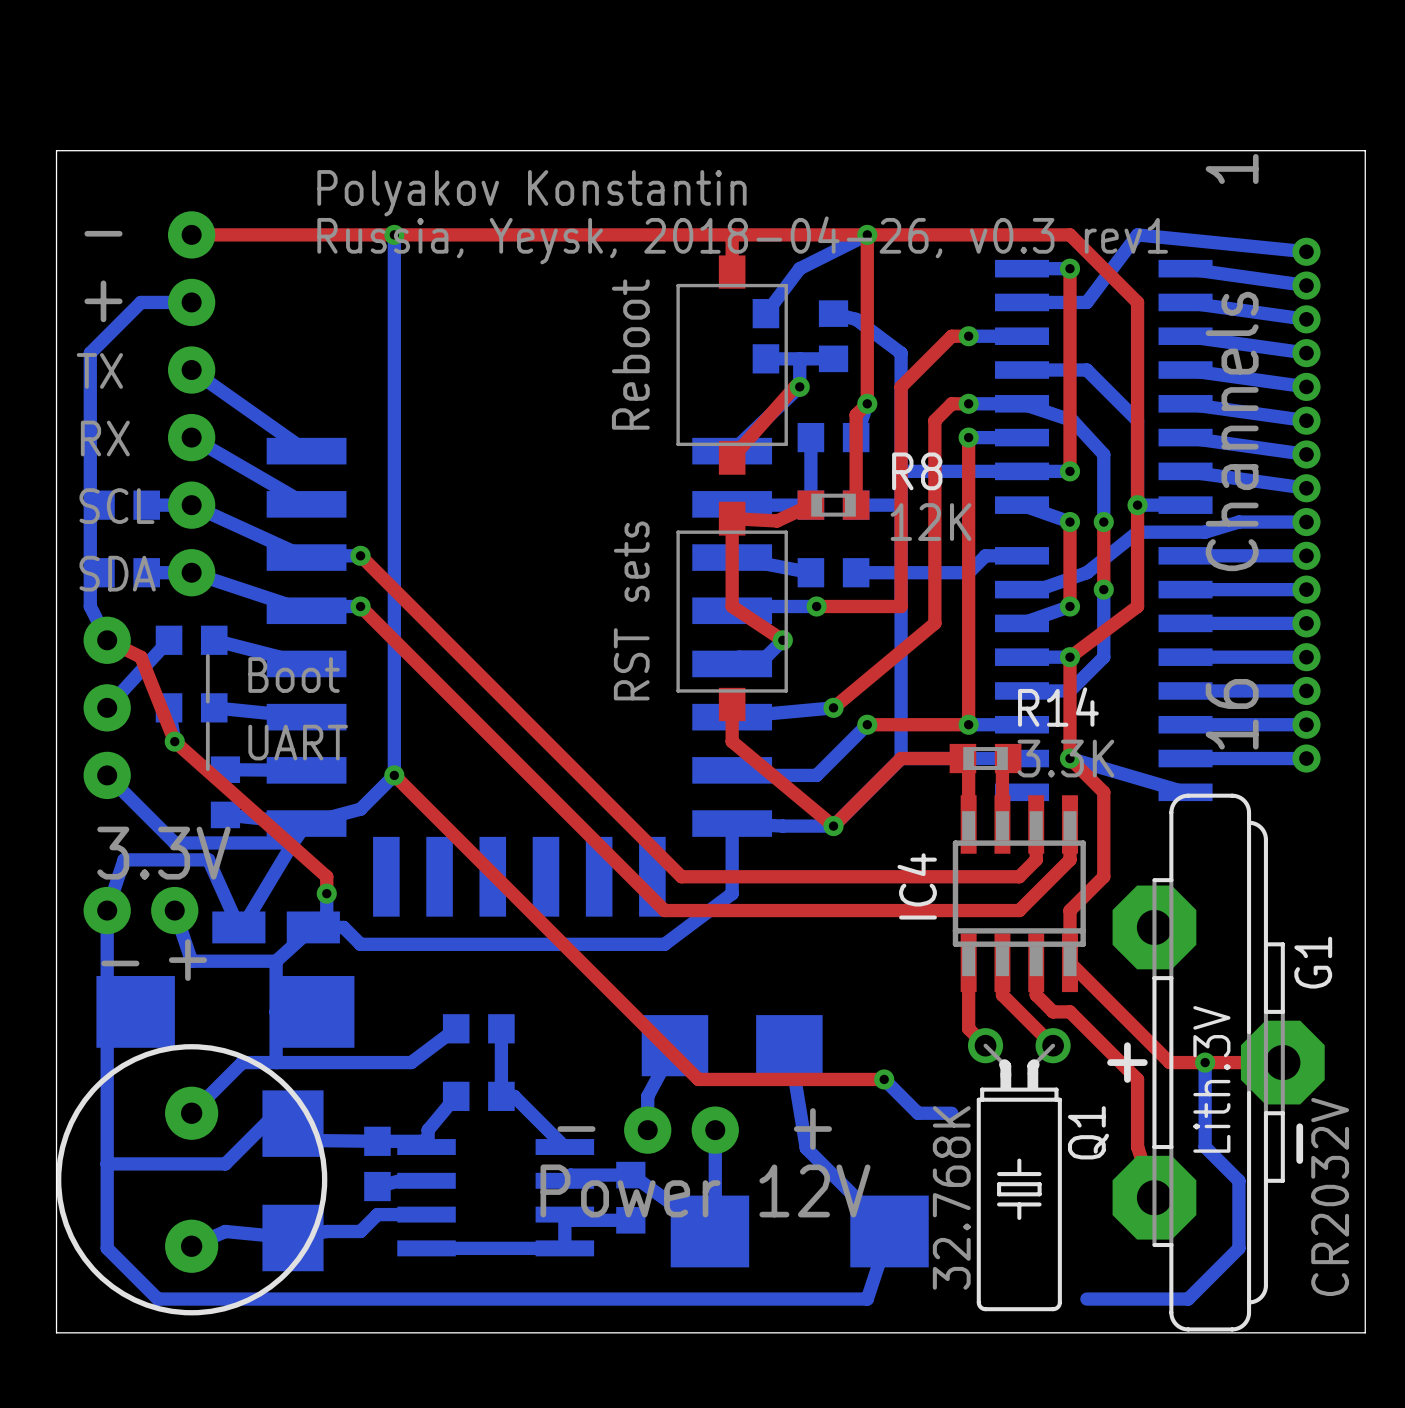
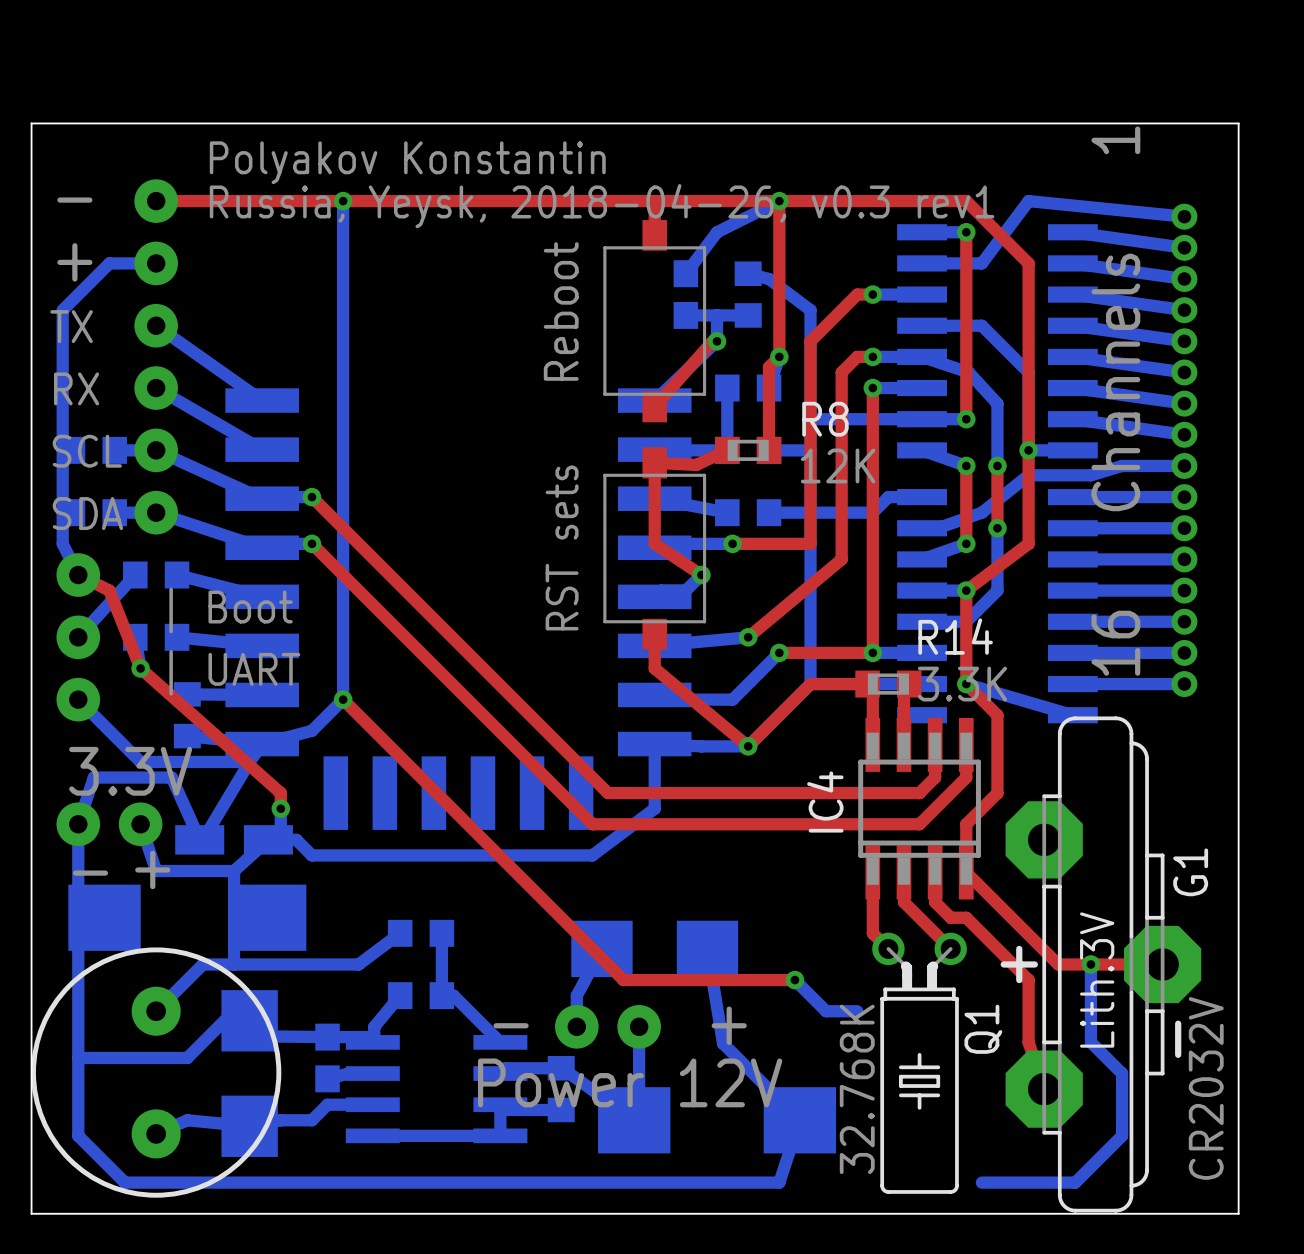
text position: Polyakov Konstantin (531, 193) -> Polyakov Konstantin (407, 162)
text position: Russia, Yeysk, 2018-04-26, v0.3 rev1 (742, 240) -> Russia, Yeysk, 2018-04-26, v0.3 rev1 (602, 206)

